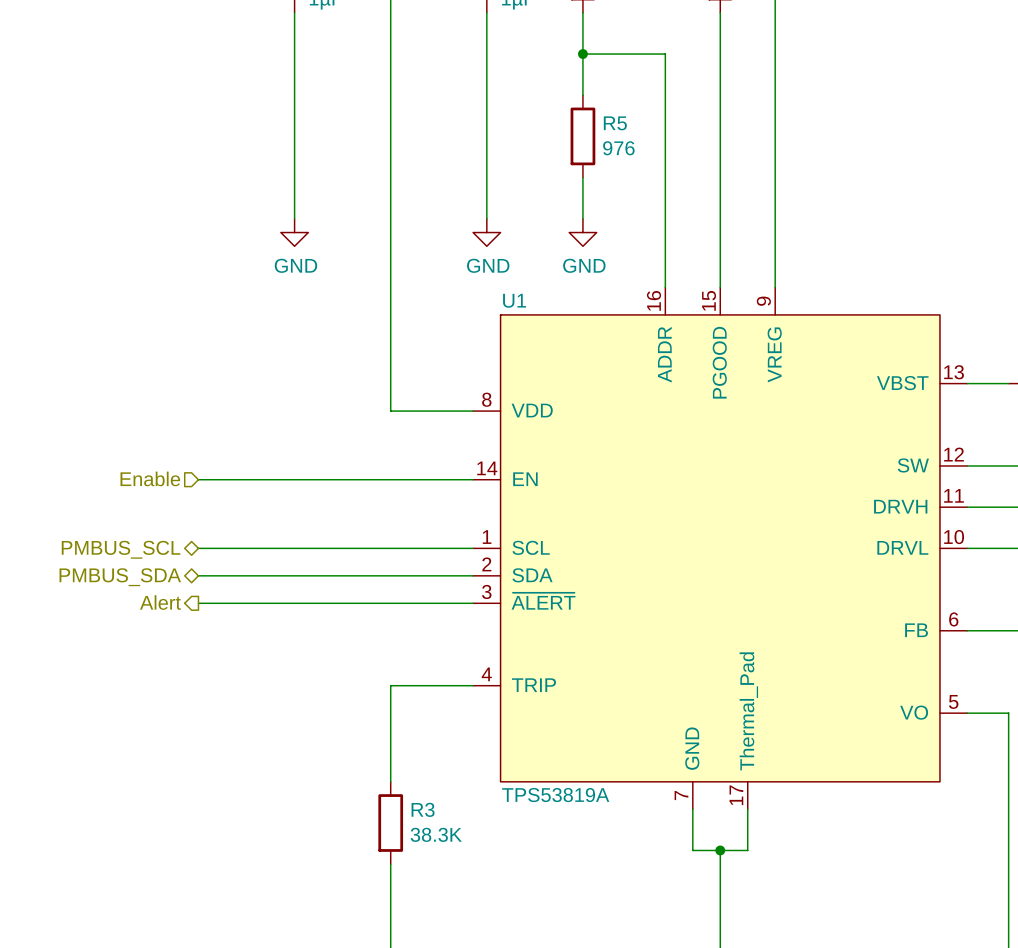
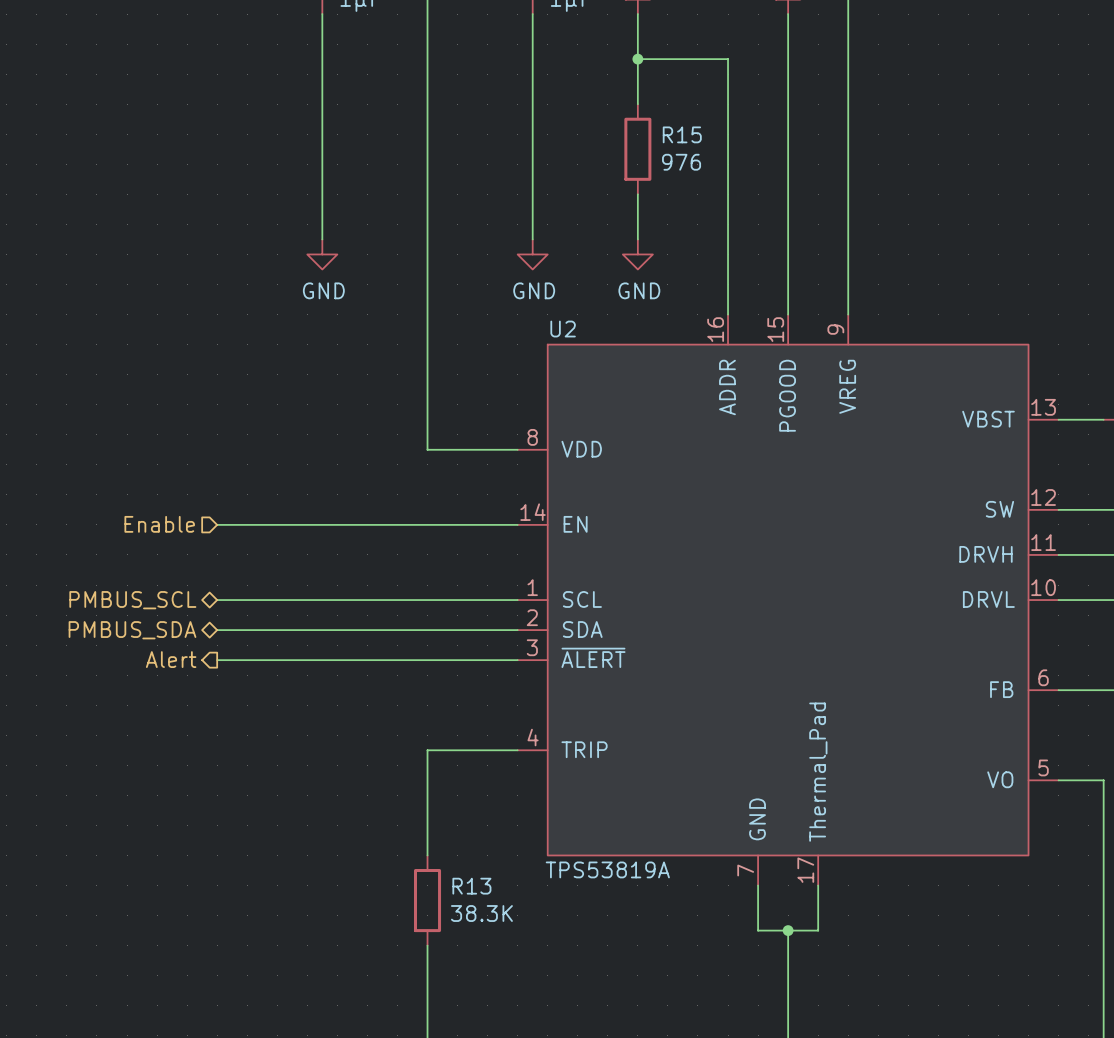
R5 name: R5 (615, 123) -> R15 (682, 134)
U1 name: U1 (514, 300) -> U2 (563, 329)
R3 name: R3 (423, 809) -> R13 (471, 886)

